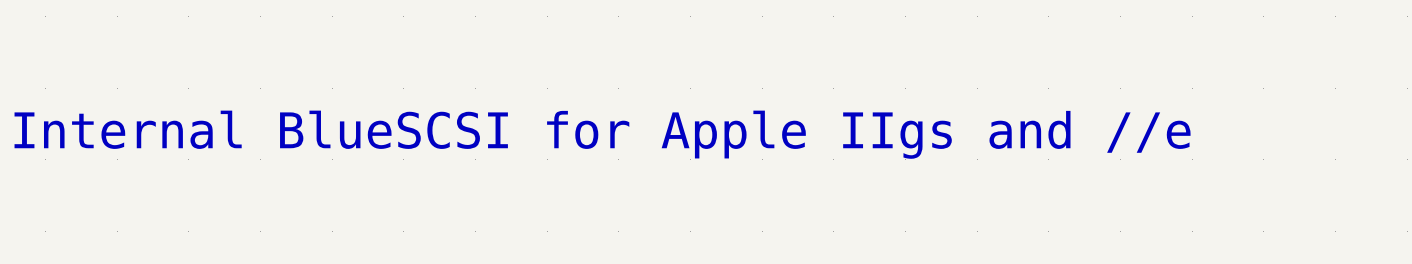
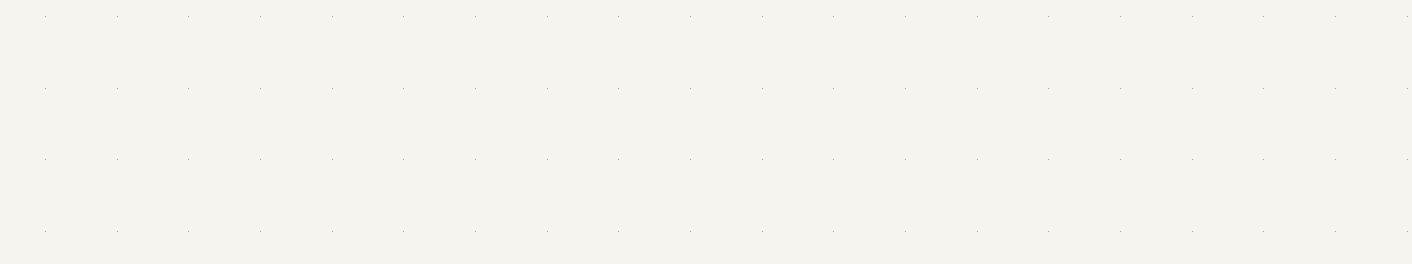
text: Internal BlueSCSI for Apple IIgs and //e (602, 134) -> none

